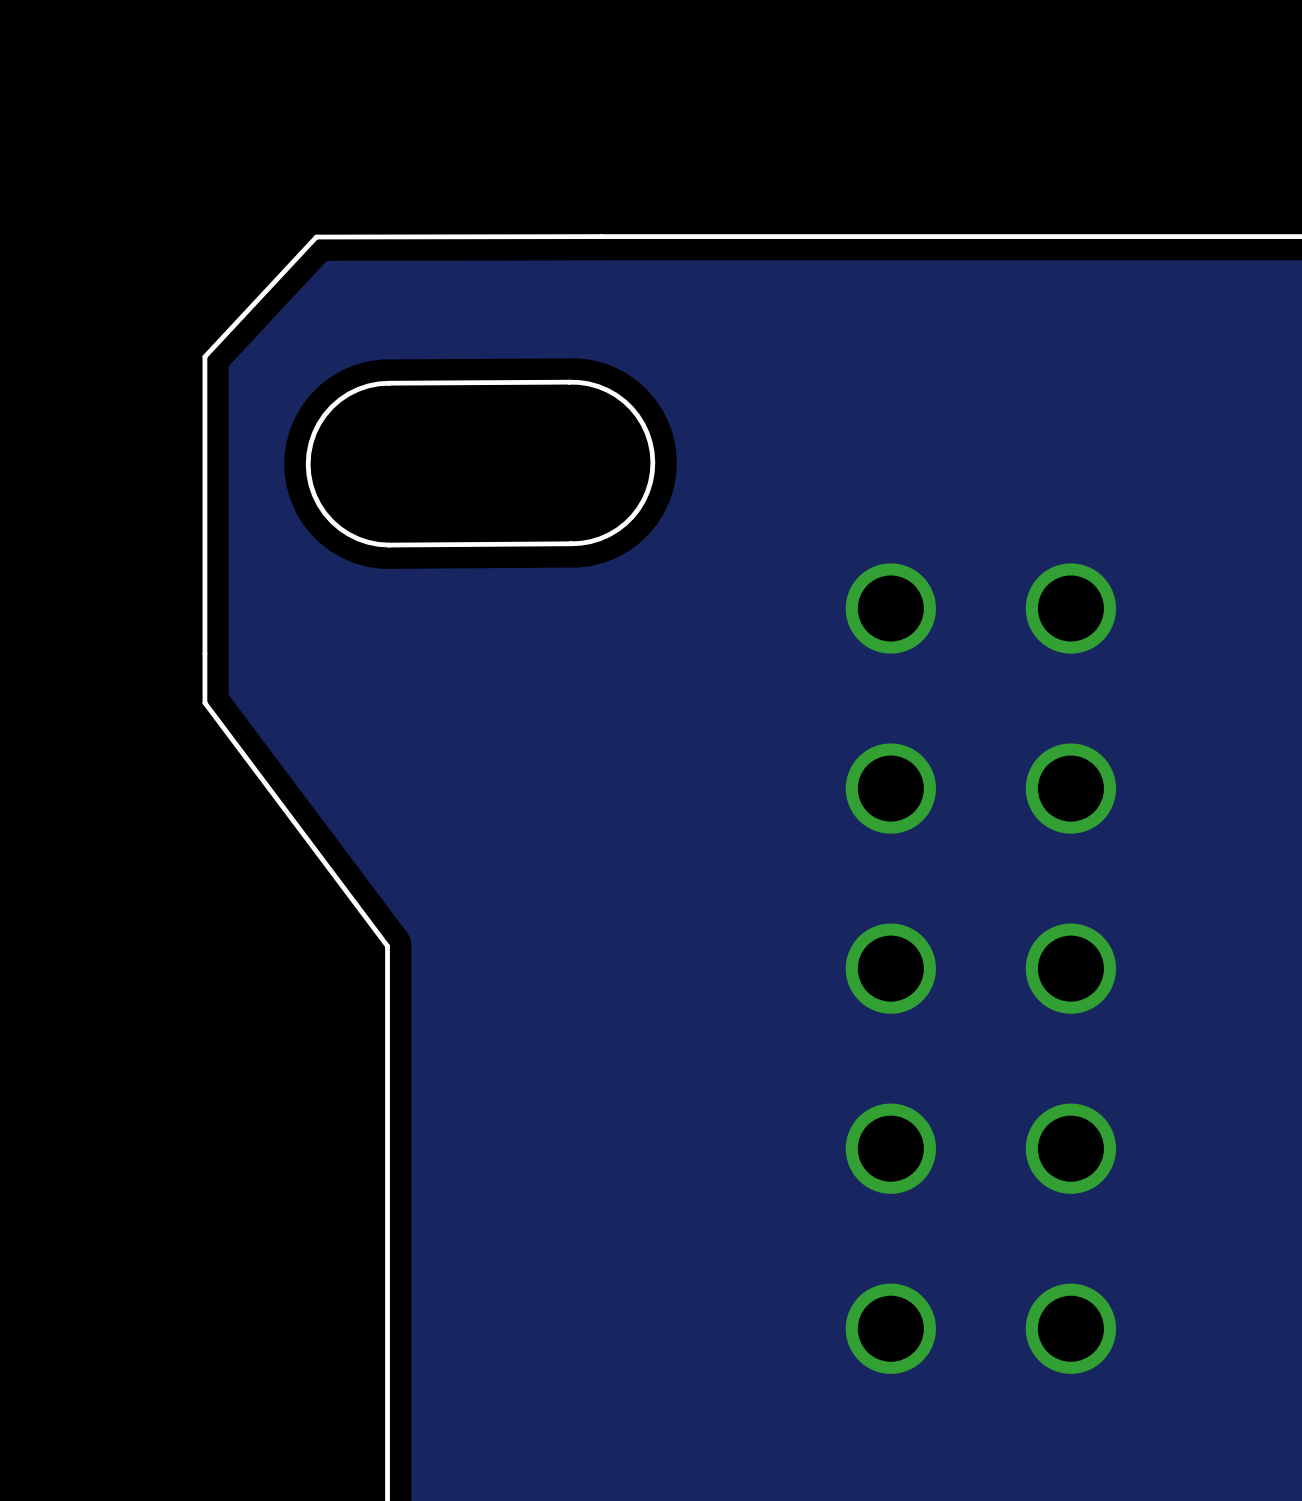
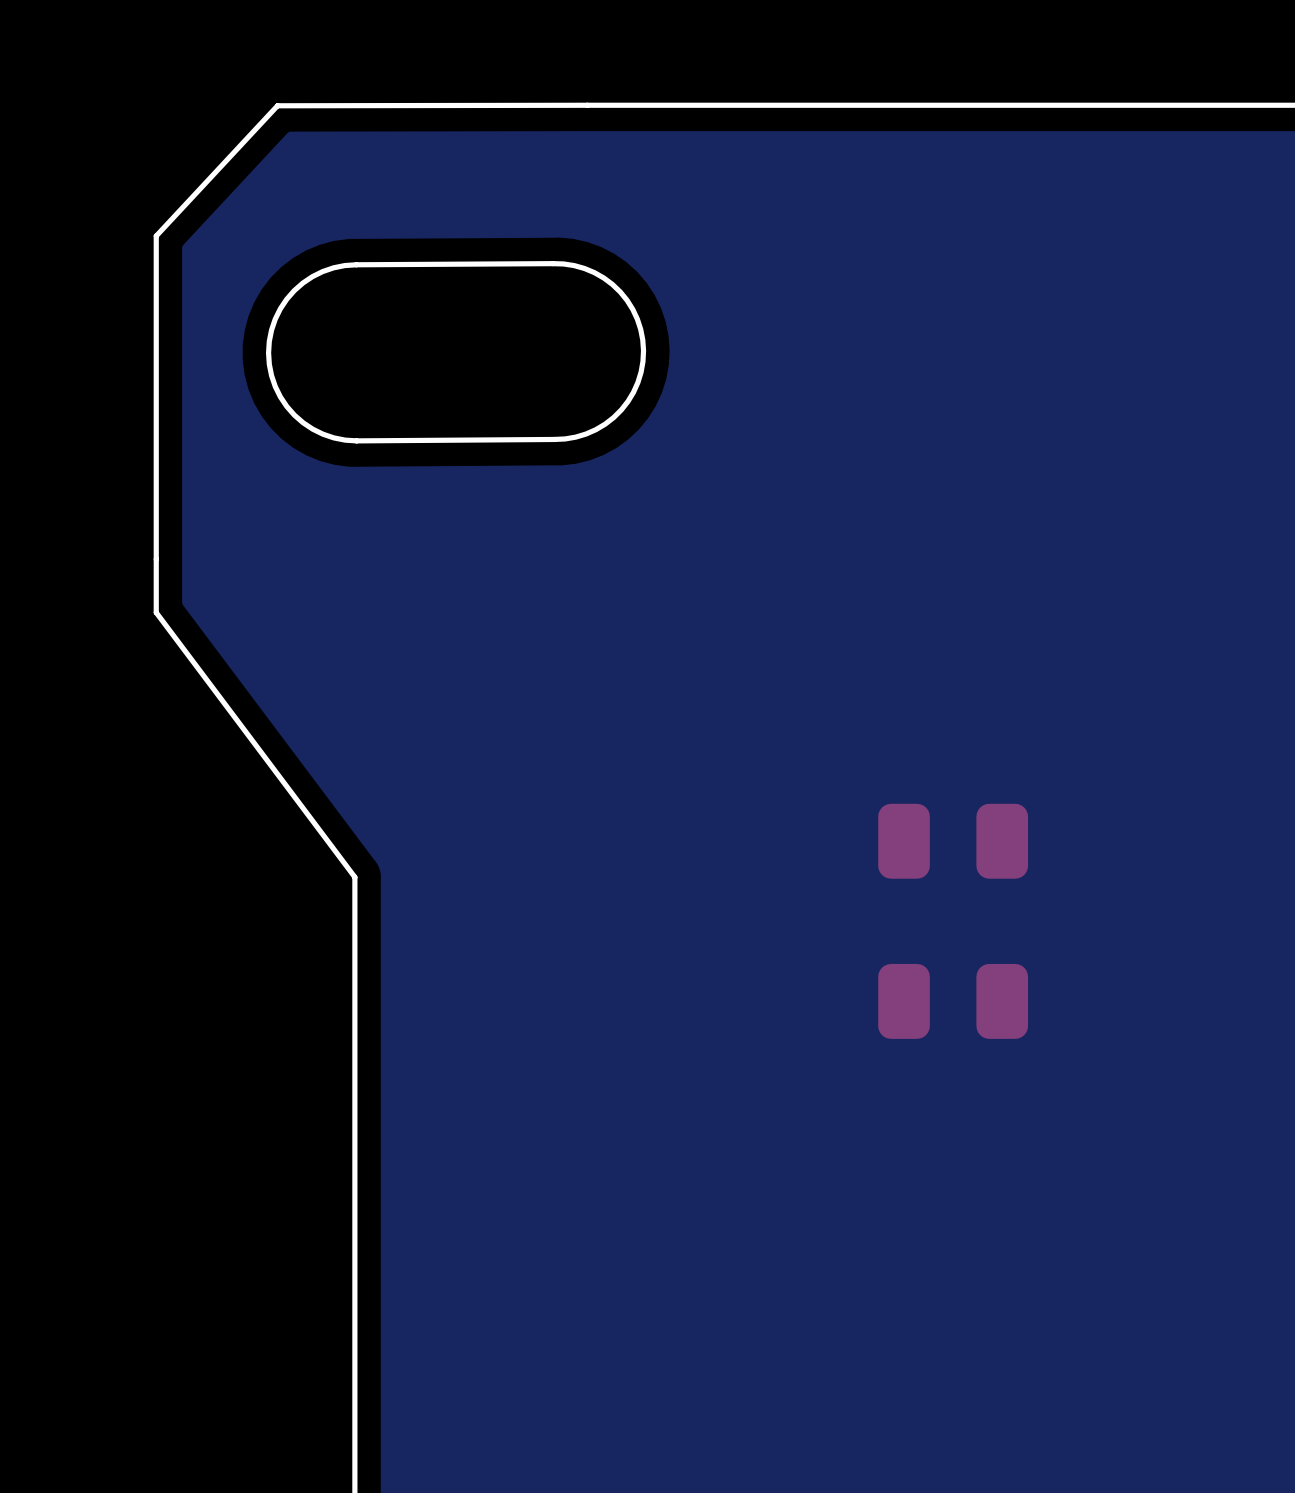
part: (890, 608) -> none
part: (1070, 608) -> none
part: (890, 788) -> none
part: (1070, 788) -> none
part: none -> (953, 841)
part: (890, 968) -> none
part: (1070, 968) -> none
part: none -> (953, 1001)
part: (890, 1148) -> none
part: (1070, 1148) -> none
part: (890, 1328) -> none
part: (1070, 1328) -> none

